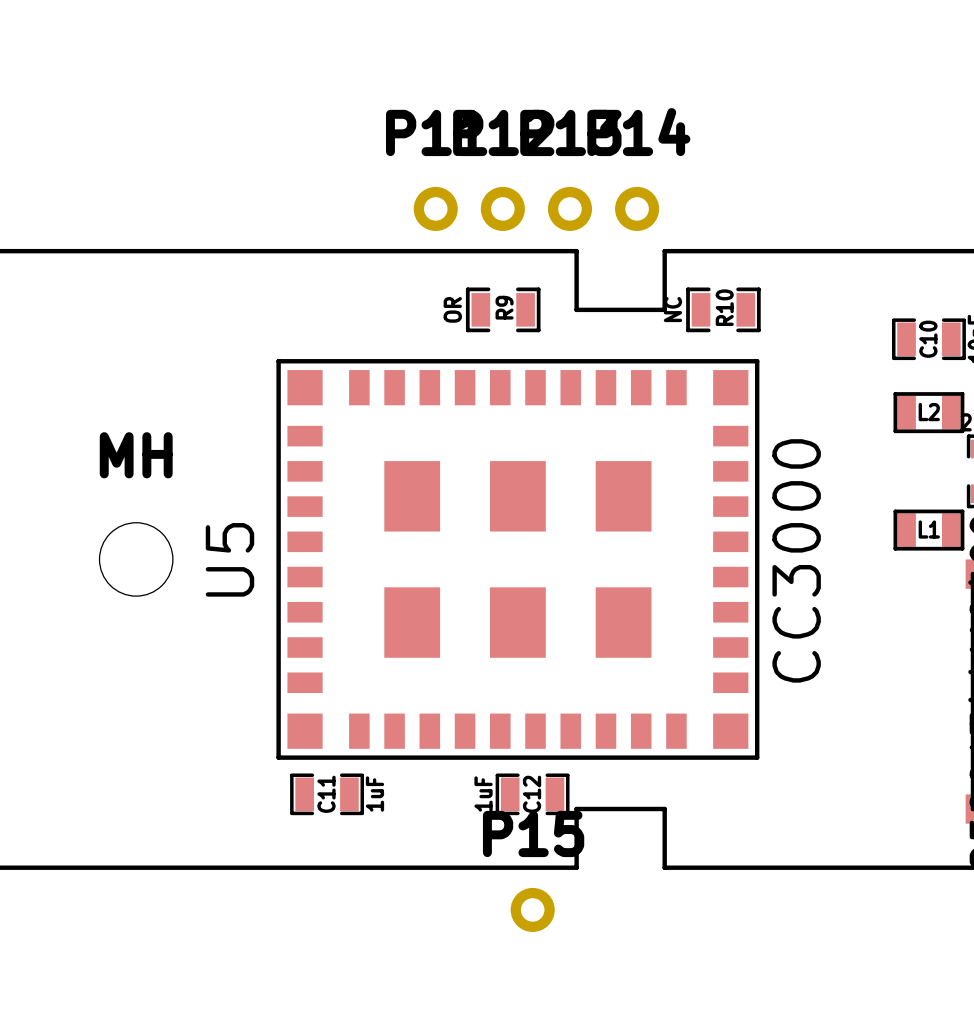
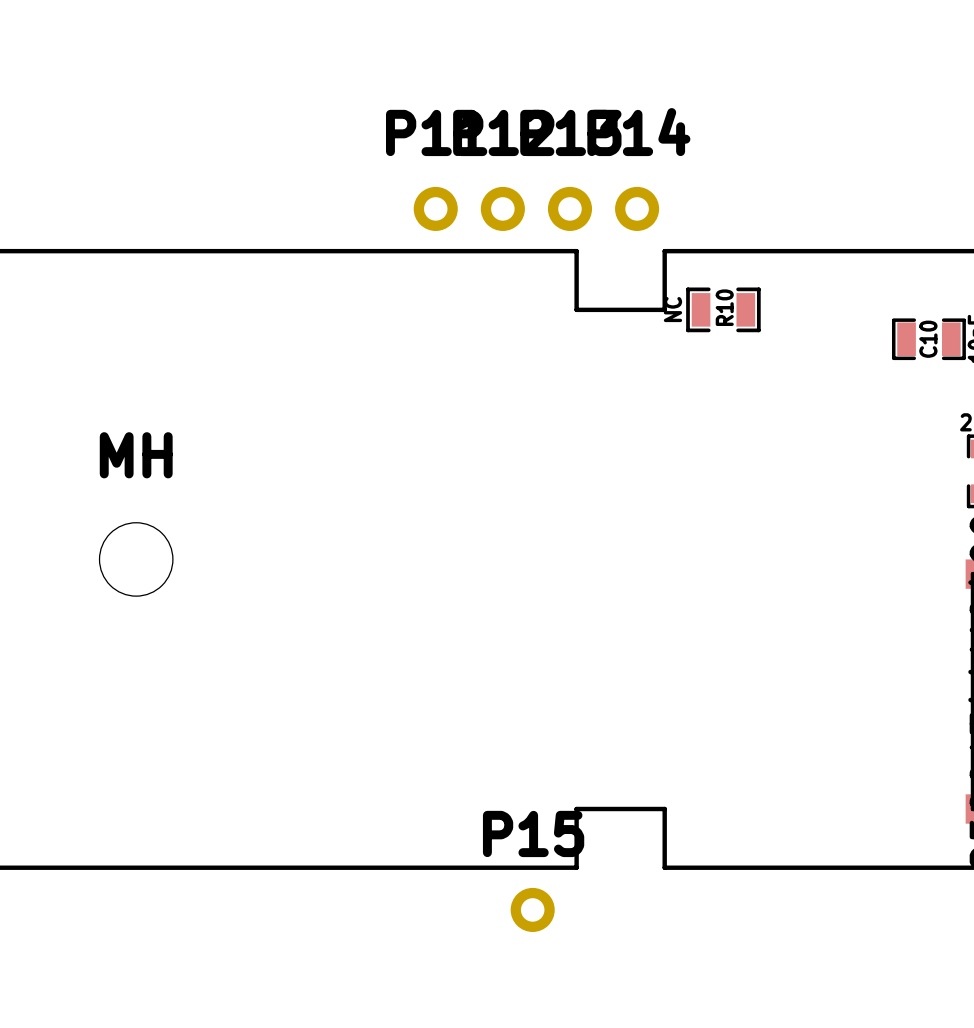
R9: OR (503, 309) -> none
L2: (928, 412) -> none
L1: (928, 530) -> none
U5: CC3000 (517, 559) -> none
C11: 1uF (327, 794) -> none
C12: 1uF (532, 794) -> none

